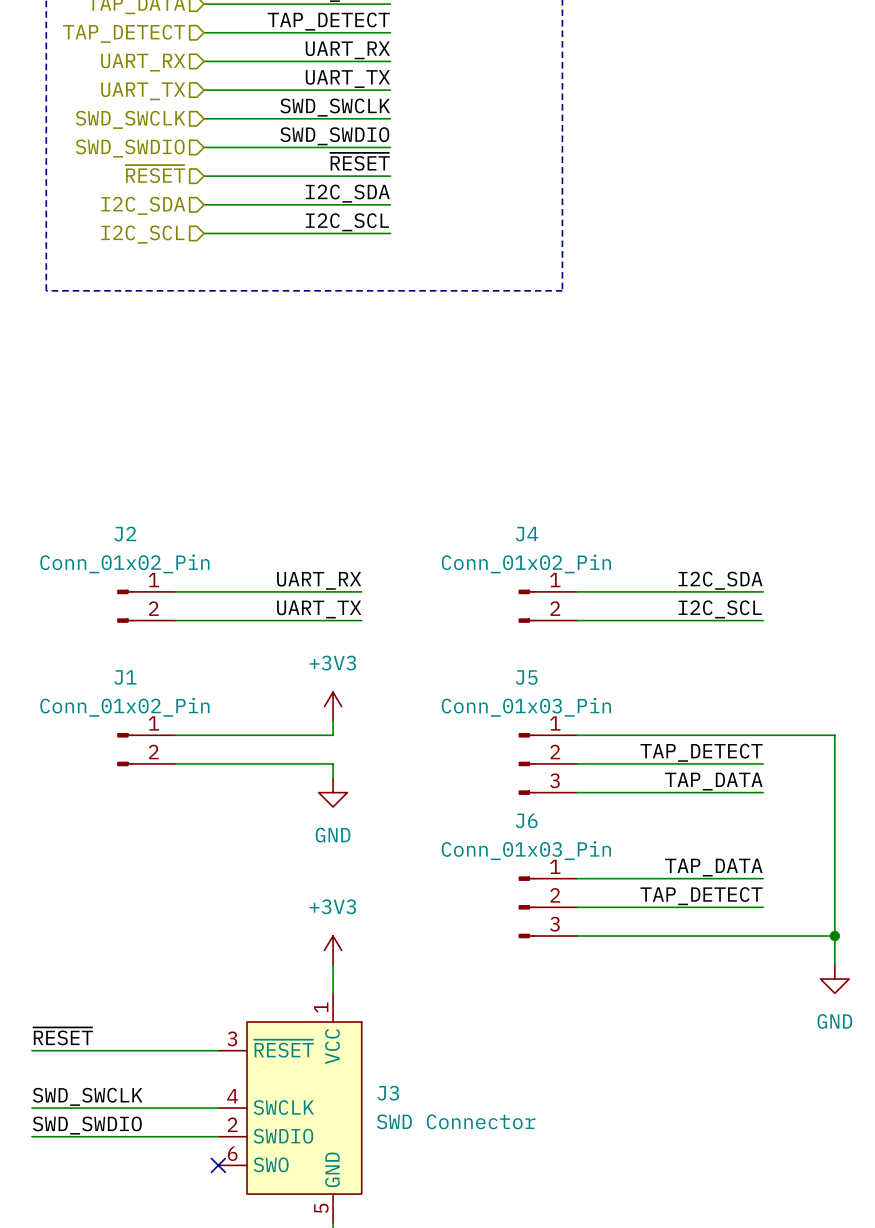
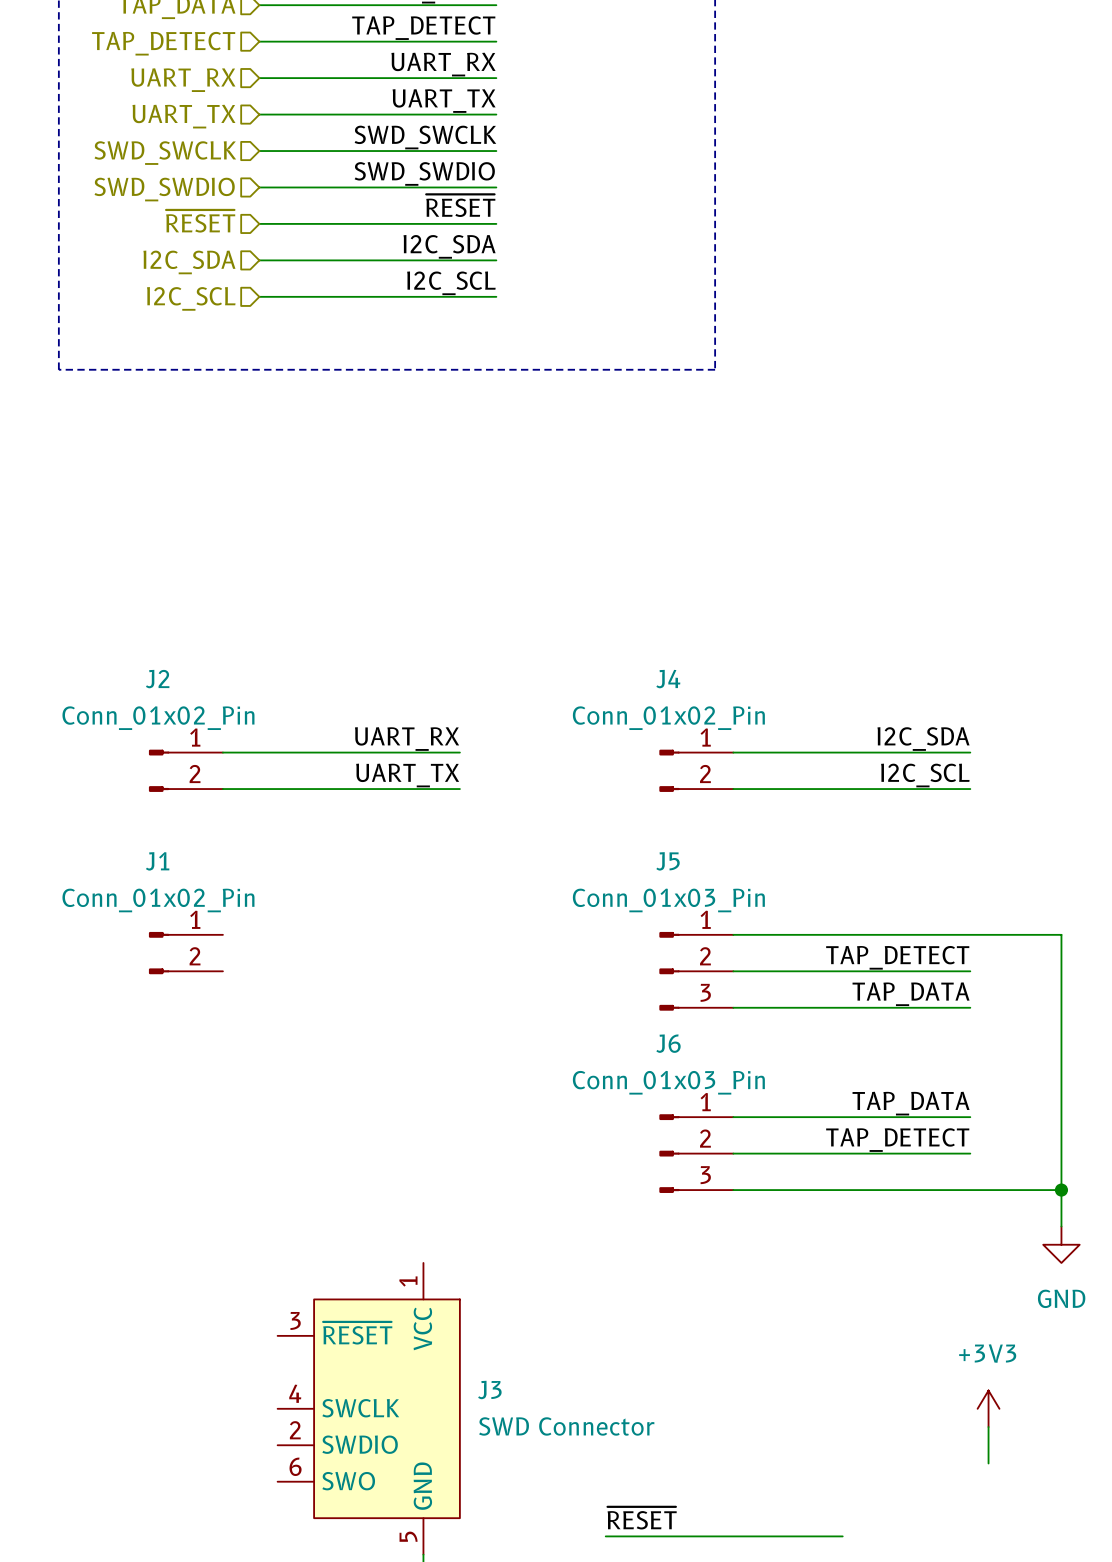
power symbol: +3V3 (333, 706) -> none
wire: (333, 720) (333, 735) (175, 735) -> none
wire: (175, 763) (333, 763) (333, 778) -> none
power symbol: GND (333, 792) -> none
power symbol: +3V3 (333, 950) -> none
wire: (333, 964) (333, 993) -> none
label: ~{RESET} (63, 1036) -> none
wire: (31, 1050) (218, 1050) -> none
label: SWD_SWCLK (87, 1096) -> none
wire: (31, 1108) (218, 1108) -> none
power symbol: none -> +3V3 (988, 1408)
wire: none -> (988, 1427) (988, 1463)
label: SWD_SWDIO (87, 1125) -> none
wire: (31, 1136) (218, 1136) -> none
no-connect mark: (218, 1165) -> none
label: none -> ~{RESET} (642, 1518)
wire: none -> (605, 1536) (842, 1536)

